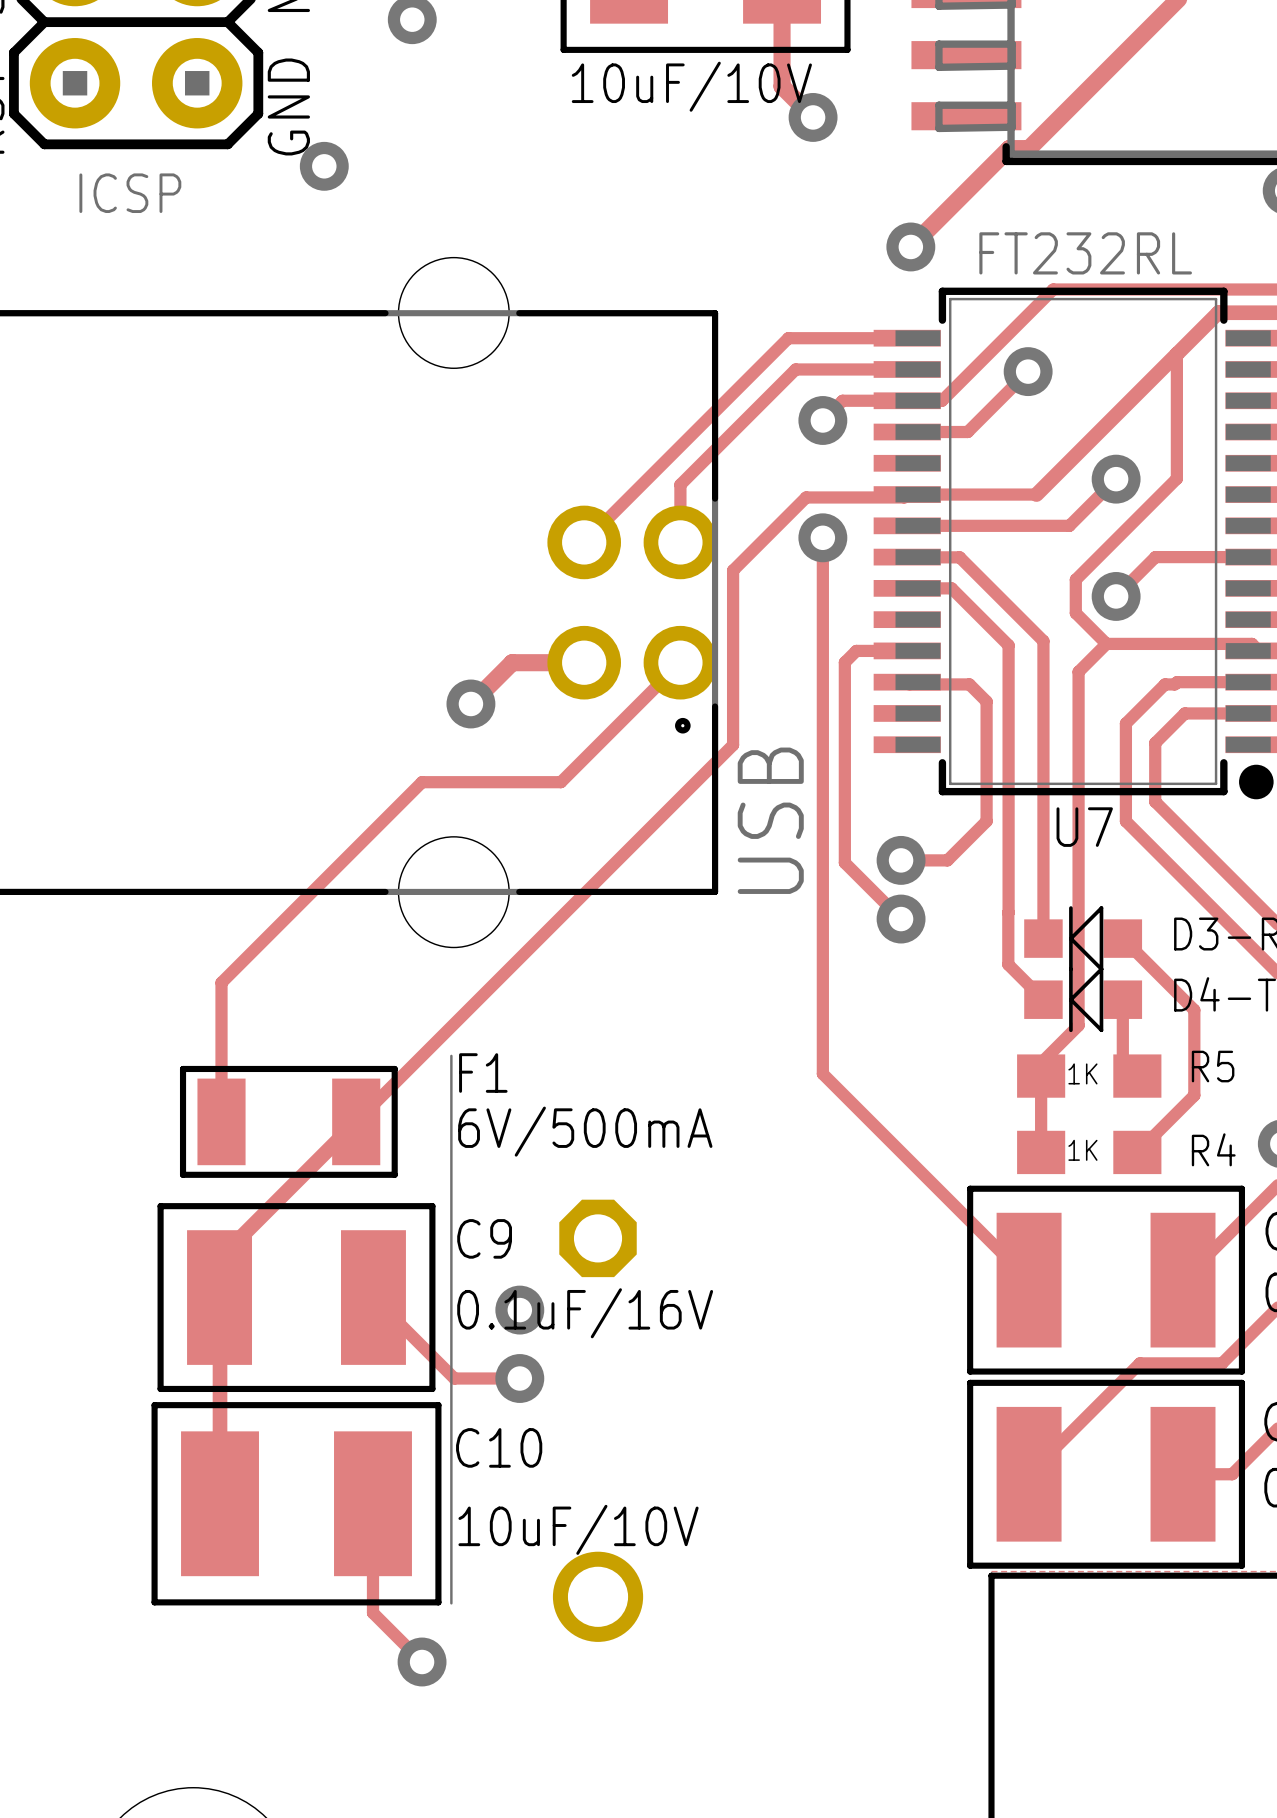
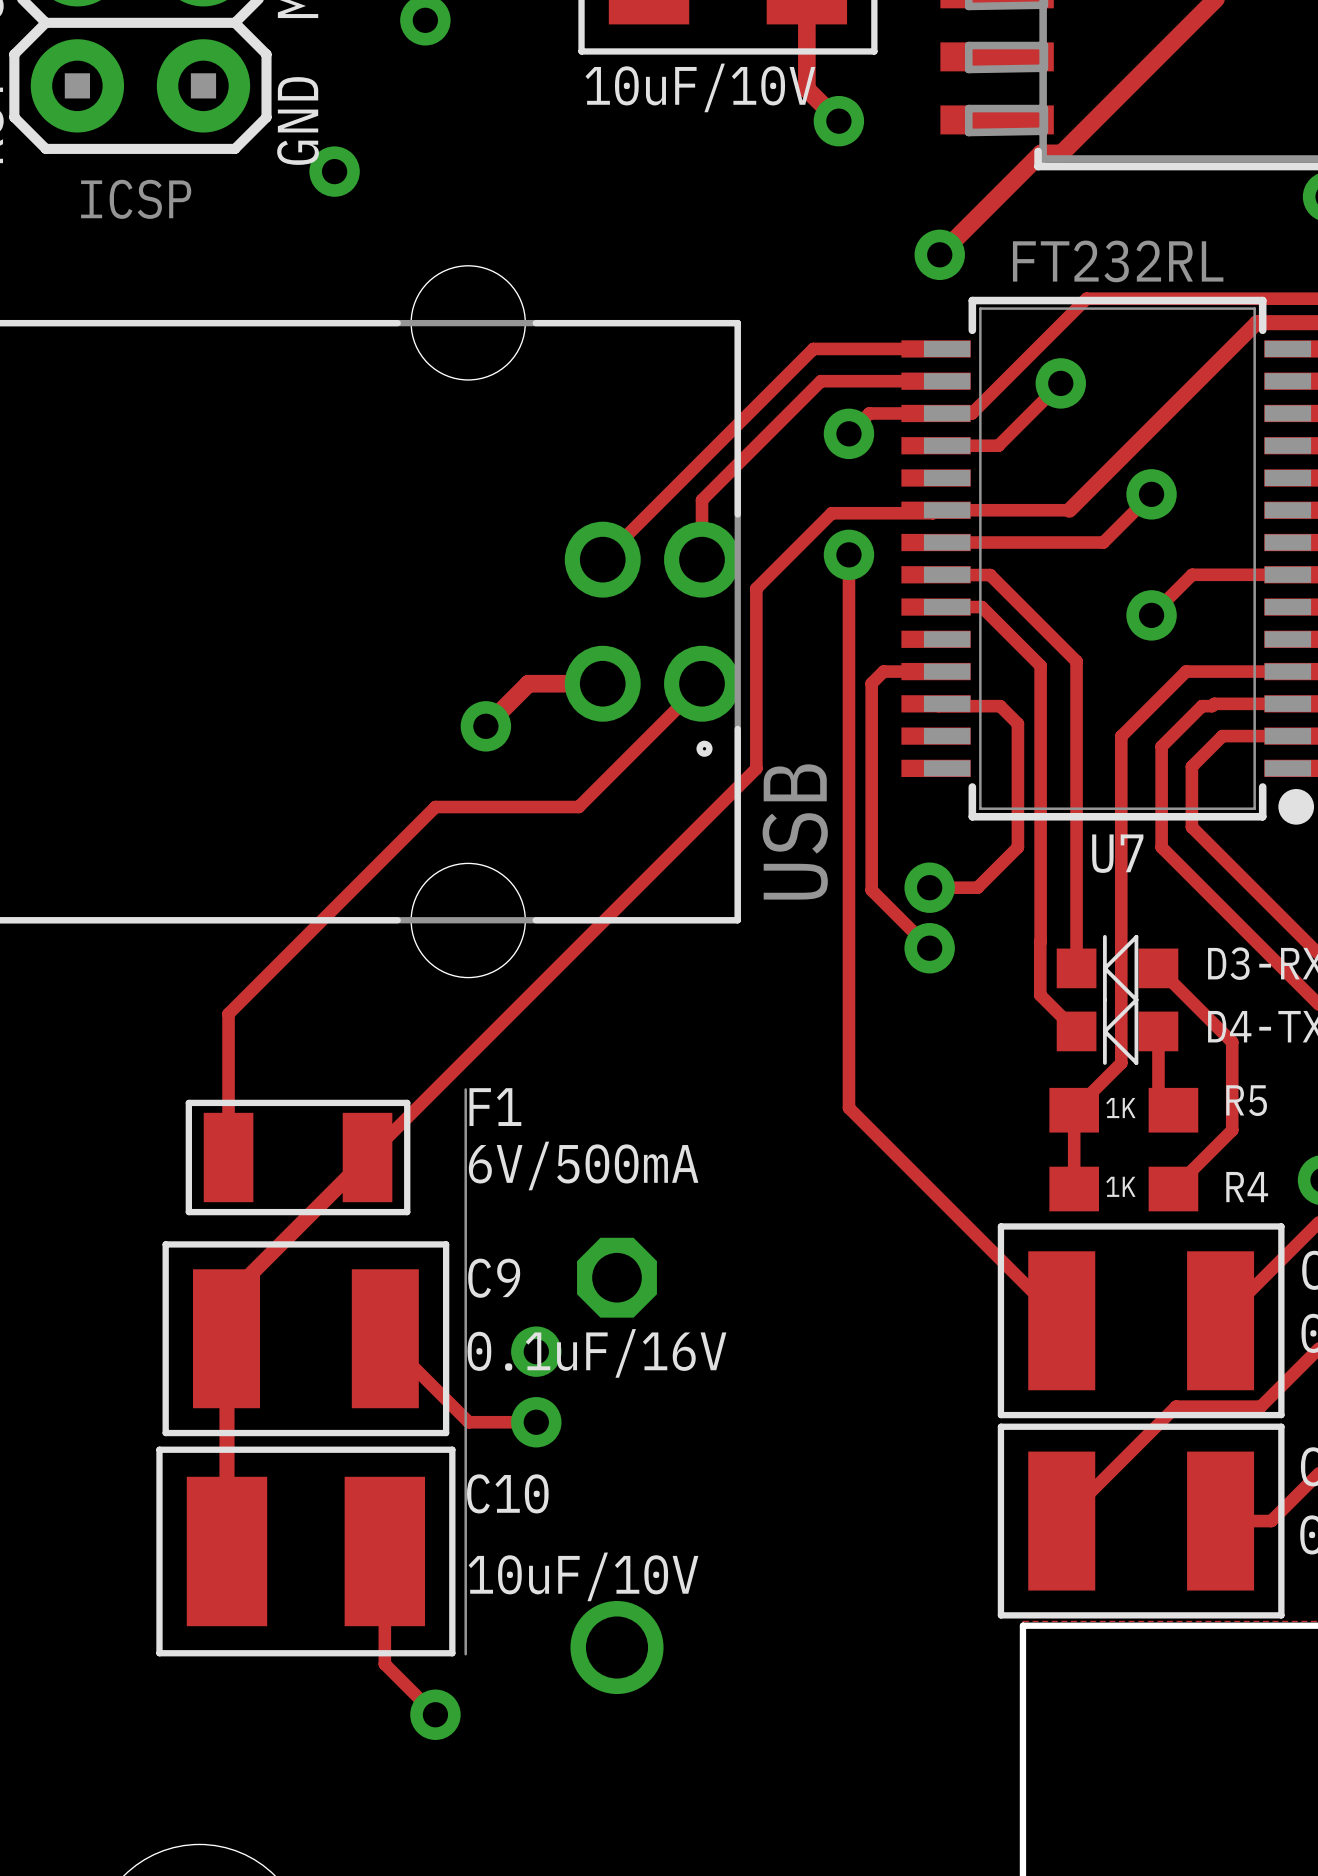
track: (1176, 354) (1176, 478) (1075, 579) (1075, 613) (1106, 643) -> none
track: (1106, 643) (1078, 671) (1078, 1025) (1041, 1062) (1041, 1076) -> (1298, 671) (1186, 671) (1121, 736) (1121, 1063) (1074, 1110)
track: (1106, 643) (1252, 643) (1259, 650) -> none

